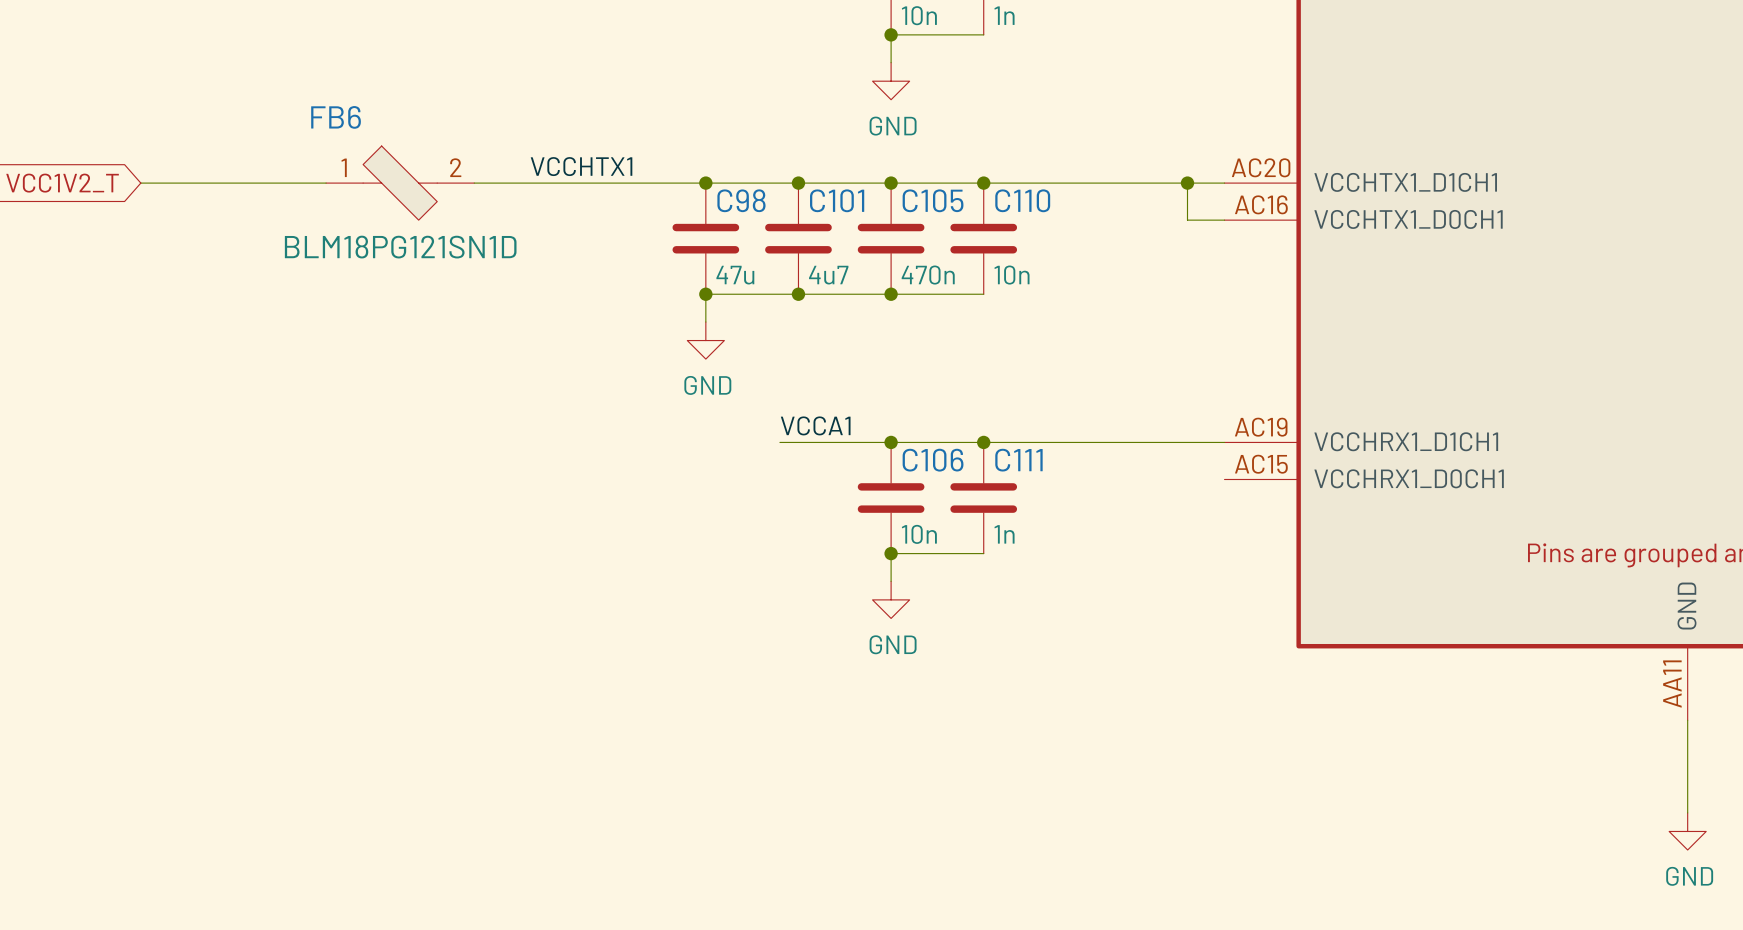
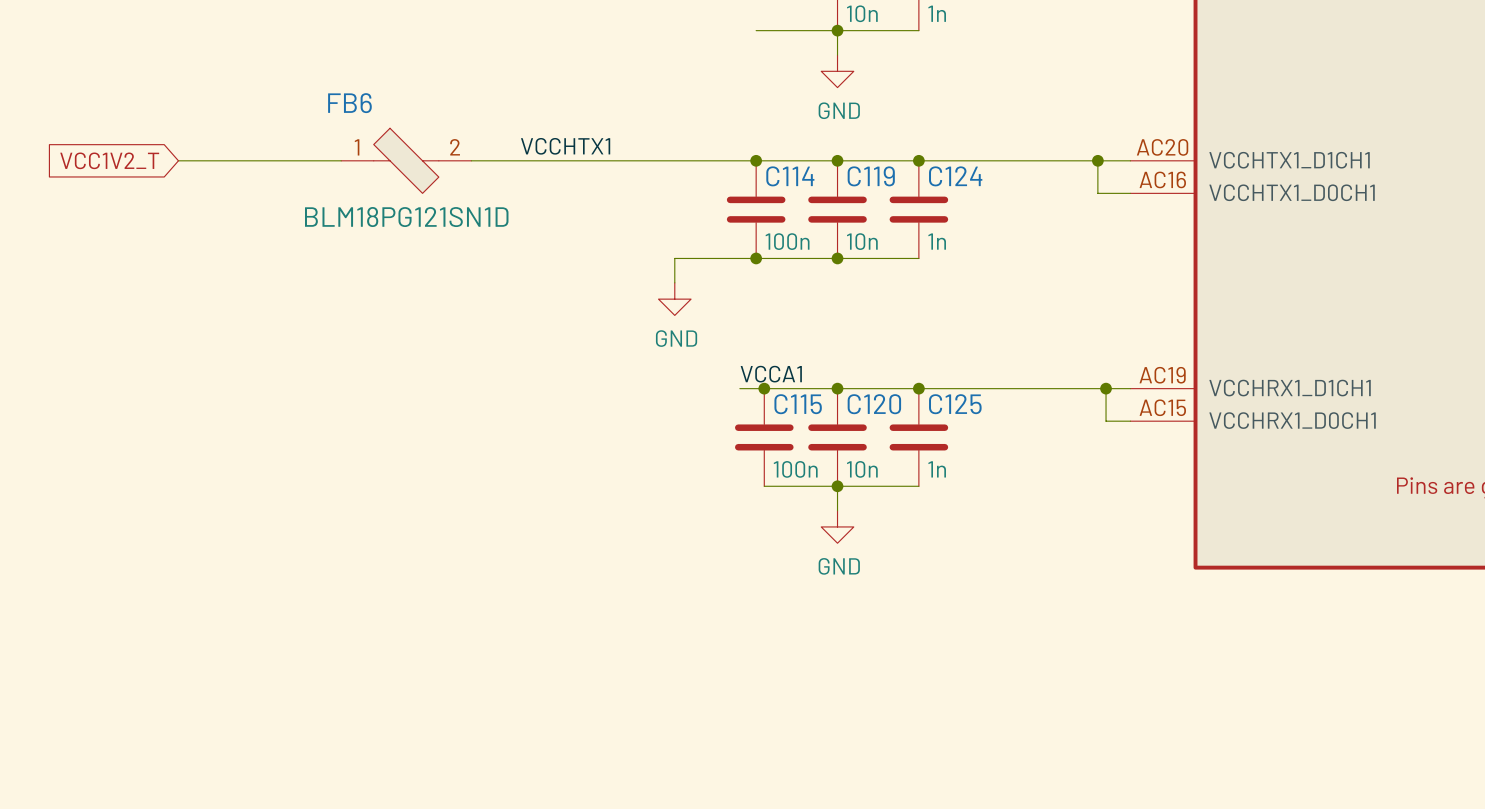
wire: none -> (756, 30) (837, 30)
junction: (705, 183) -> none
C101 name: C101 (837, 200) -> C114 (790, 176)
C105 name: C105 (933, 200) -> C119 (871, 176)
C110 name: C110 (1022, 200) -> C124 (955, 176)
C98: (705, 238) -> none
C101 text: 4u7 (828, 275) -> 100n (787, 241)
C105 text: 470n (928, 275) -> 10n (862, 241)
C110 text: 10n (1012, 275) -> 1n (937, 241)
junction: (705, 294) -> none
junction: none -> (764, 388)
wire: none -> (1106, 388) (1106, 421) (1130, 421)
junction: none -> (1106, 388)
C106 name: C106 (933, 460) -> C120 (874, 404)
C111 name: C111 (1018, 460) -> C125 (955, 404)
C115: none -> (764, 437)
wire: none -> (764, 486) (837, 486)

